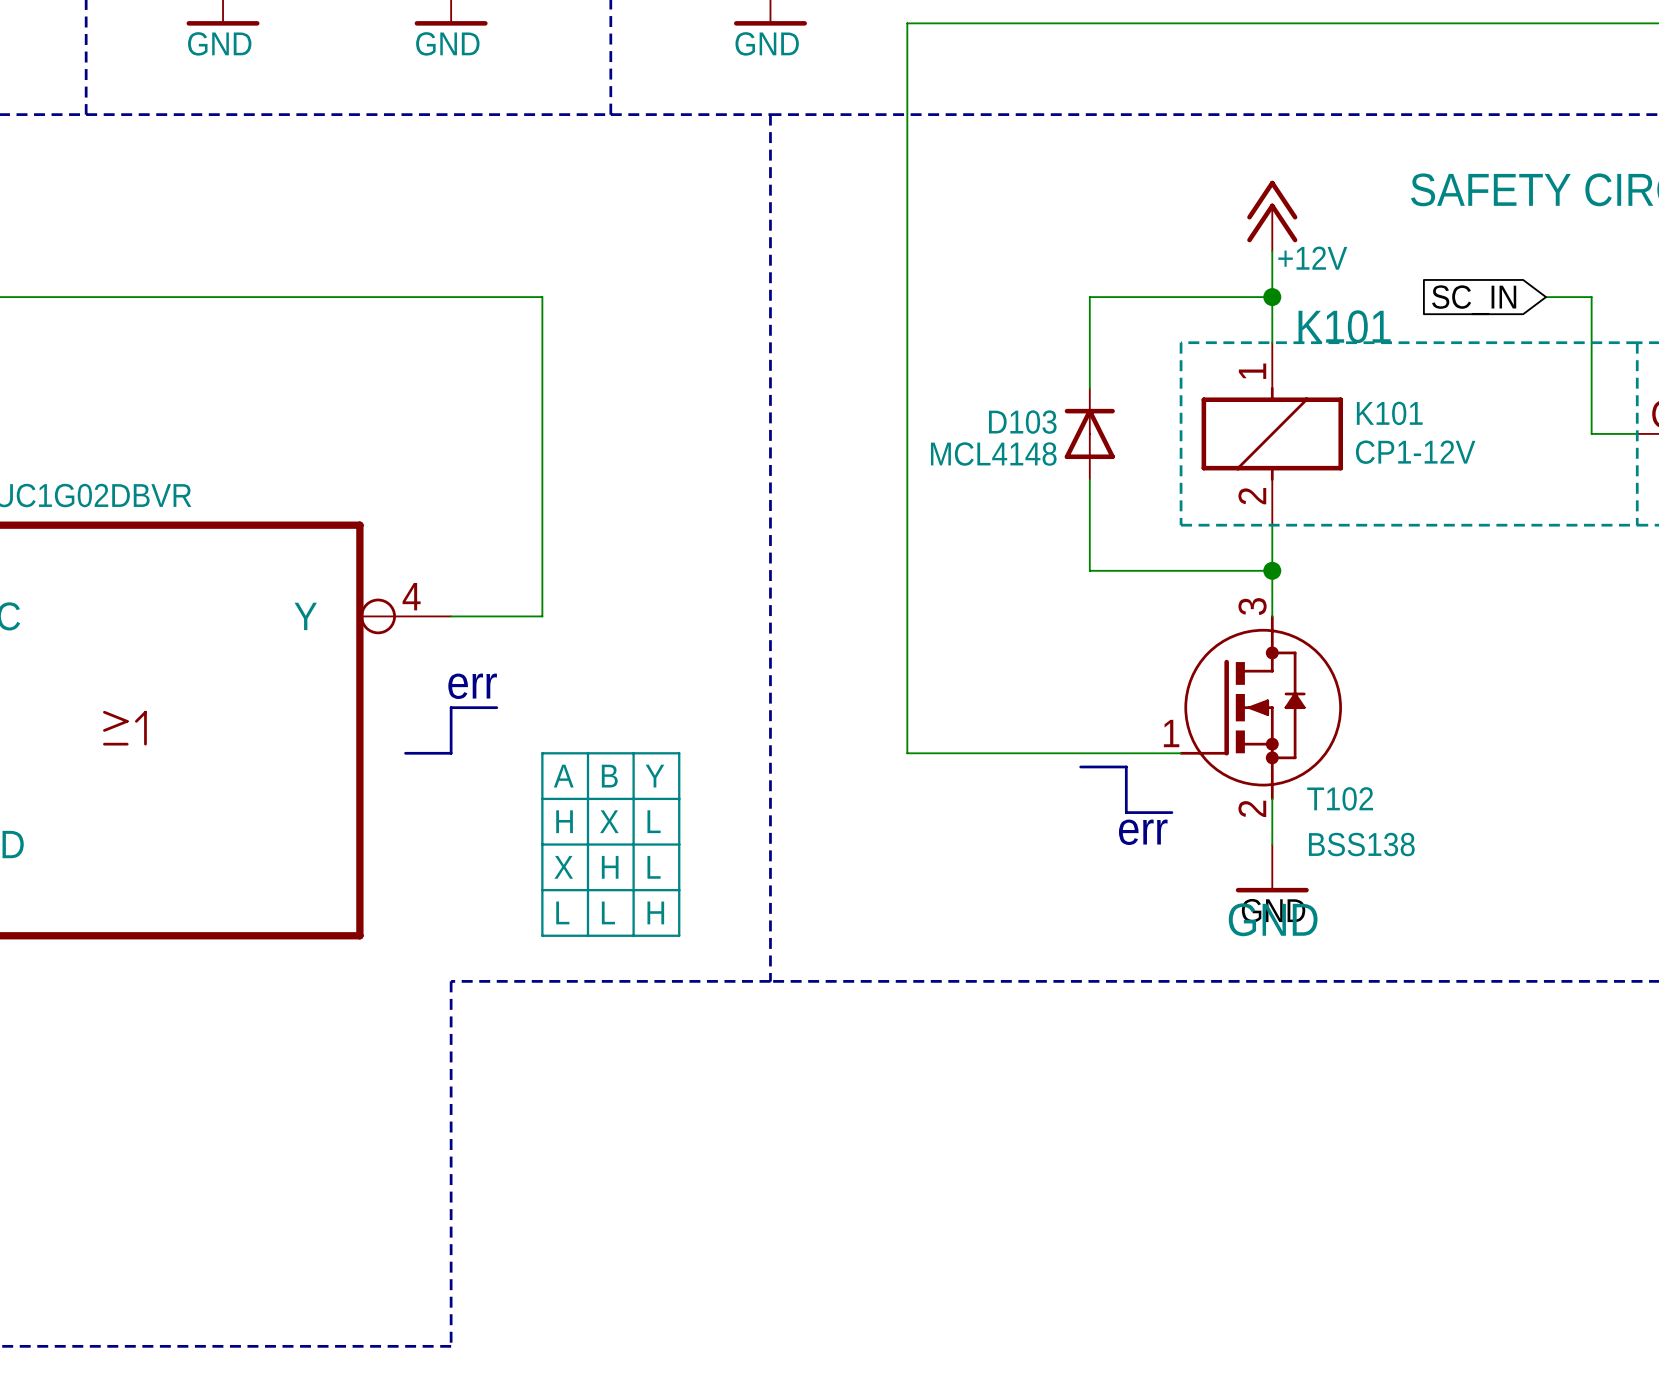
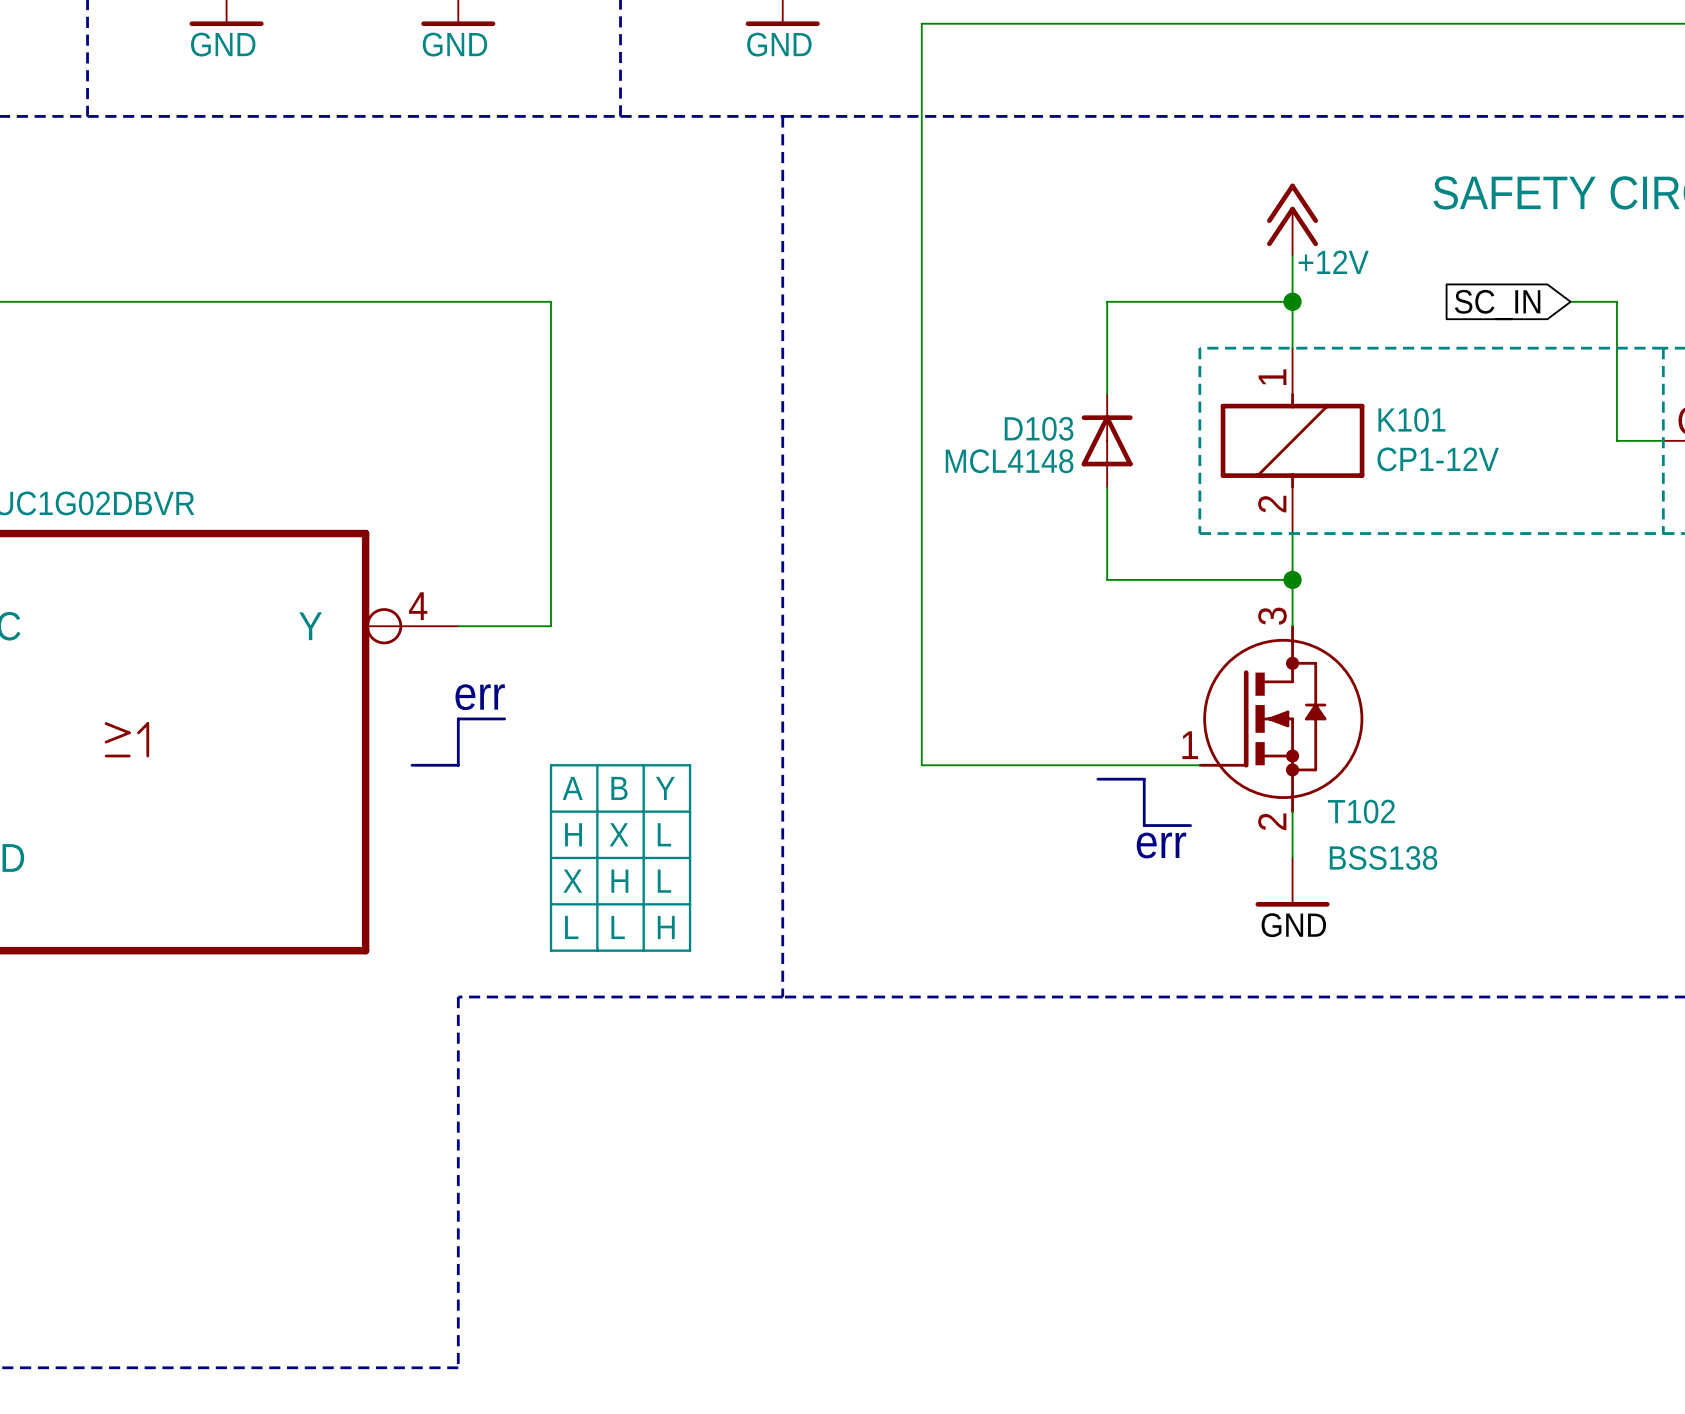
K101 name: K101 (1344, 326) -> none
power symbol text: GND (1273, 919) -> none

